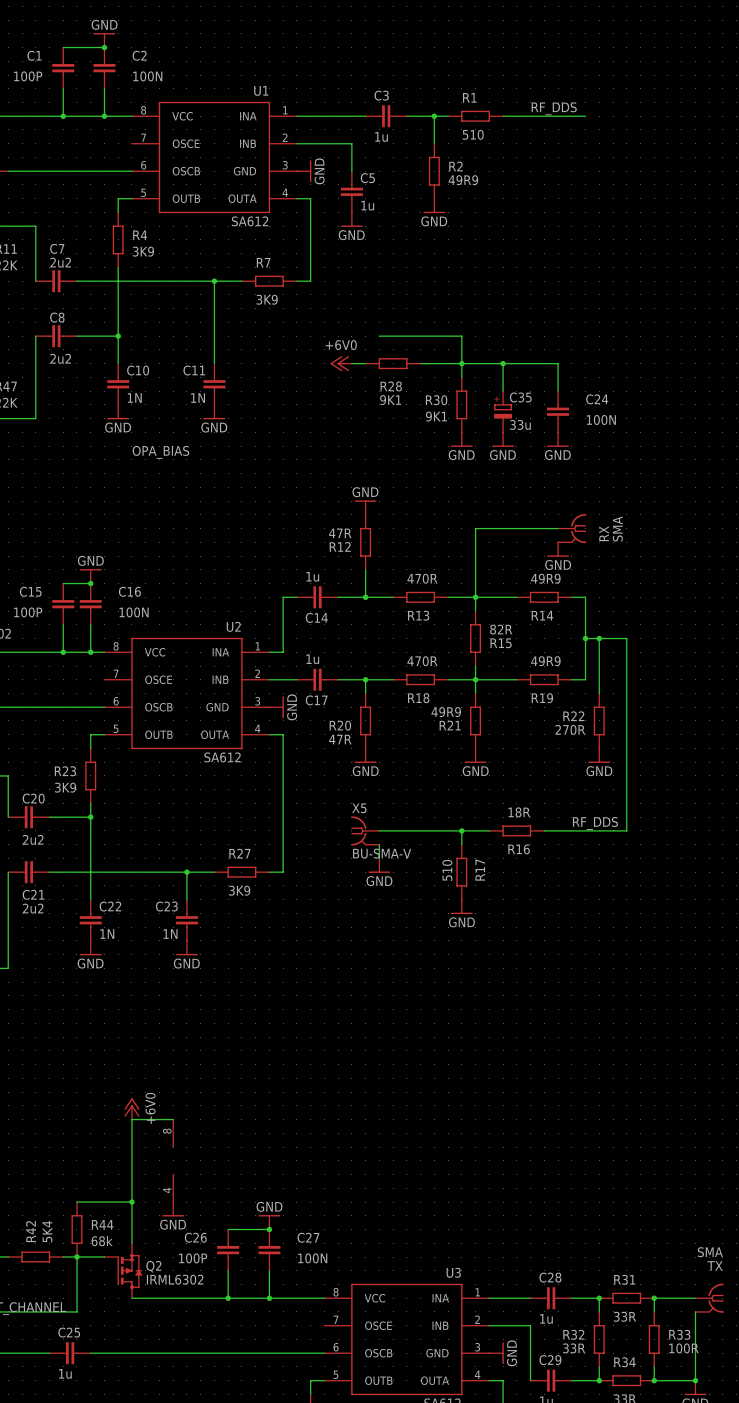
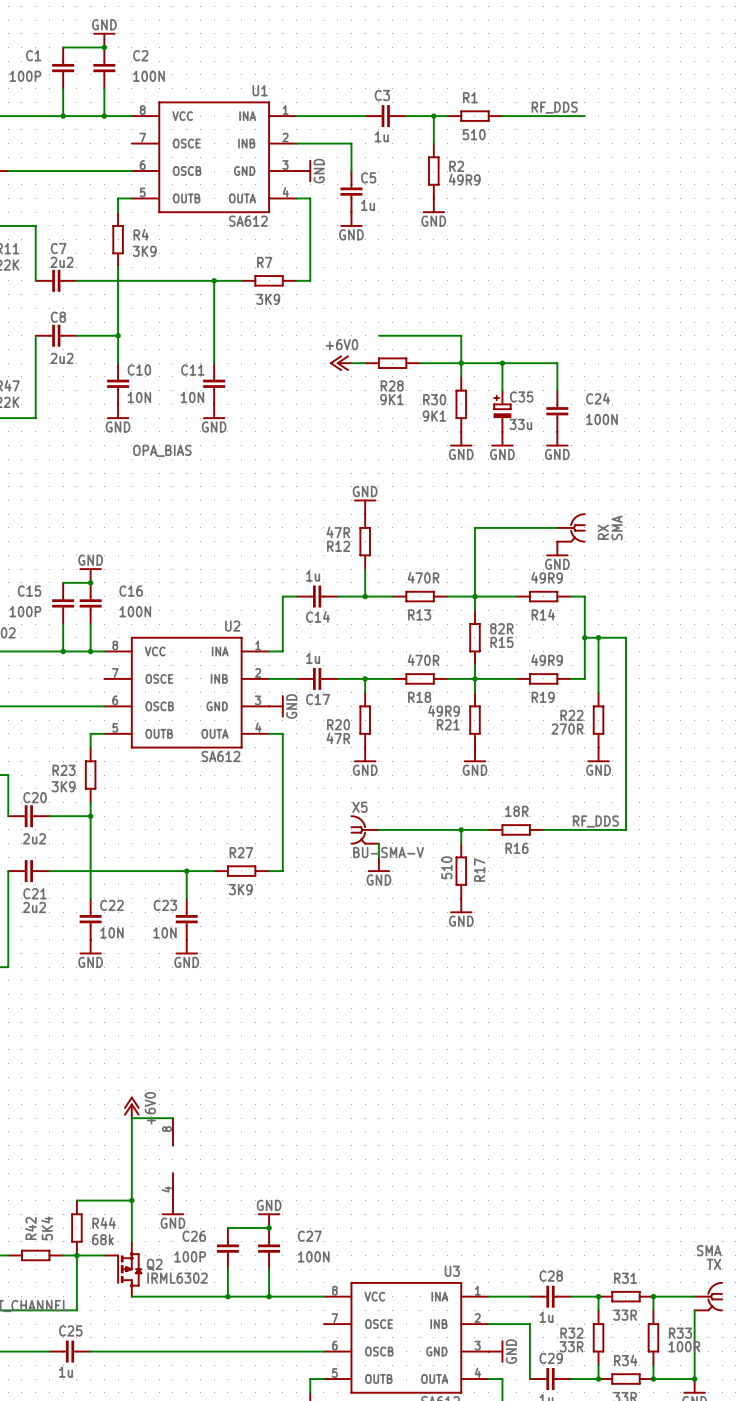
C10 value: 1N (134, 398) -> 10N (139, 397)
C11 value: 1N (198, 398) -> 10N (192, 397)
C22 value: 1N (107, 934) -> 10N (111, 932)
C23 value: 1N (170, 934) -> 10N (165, 932)

